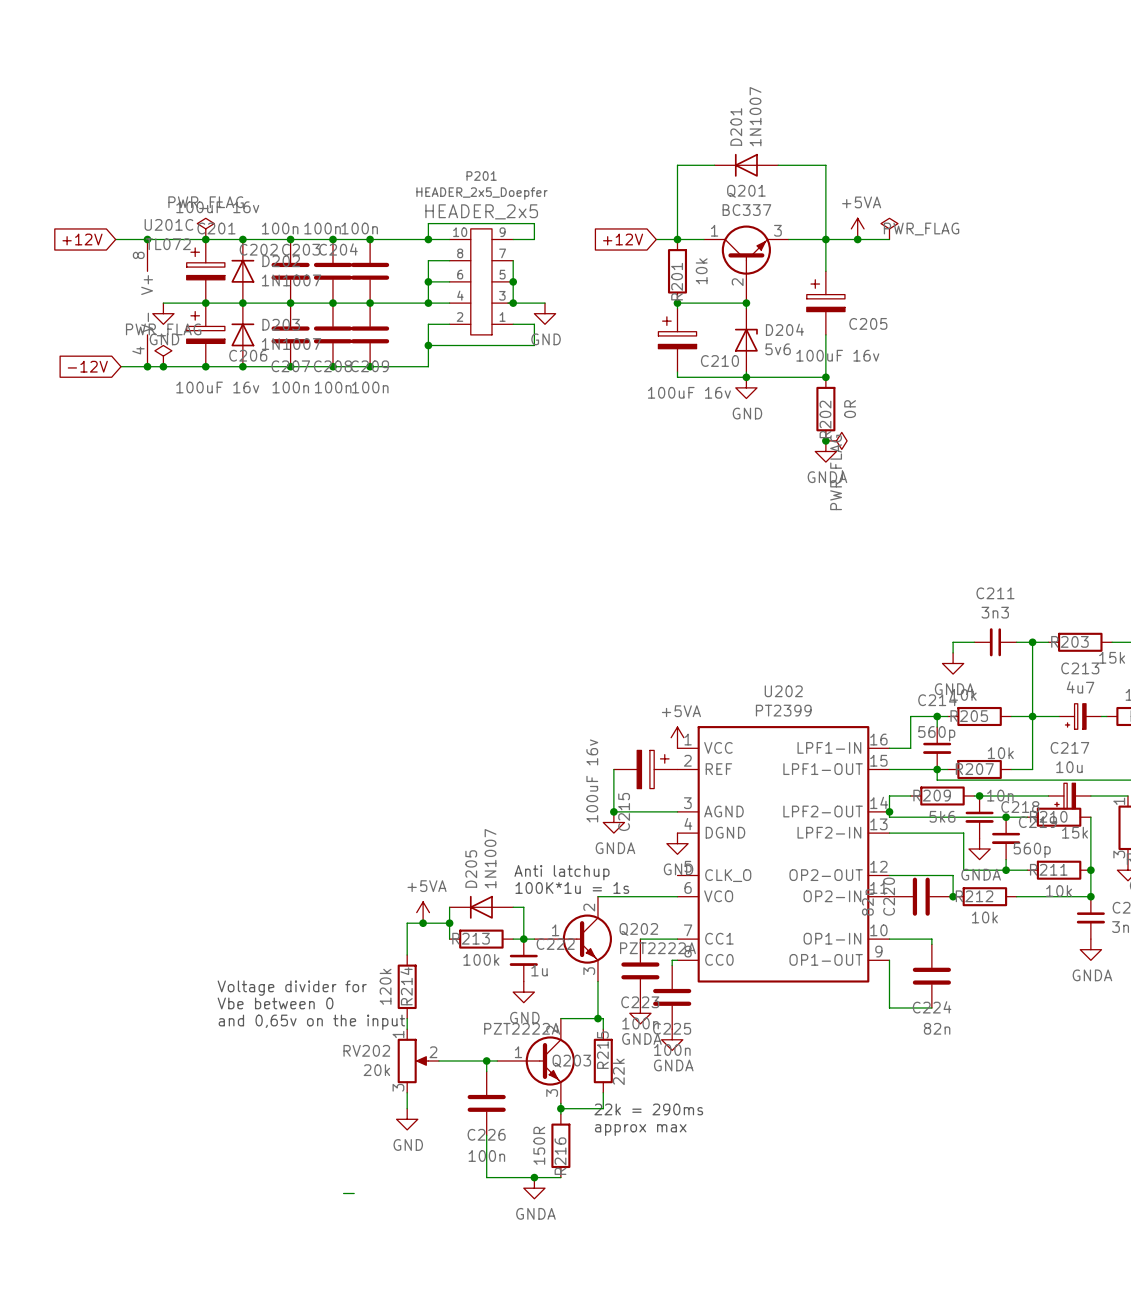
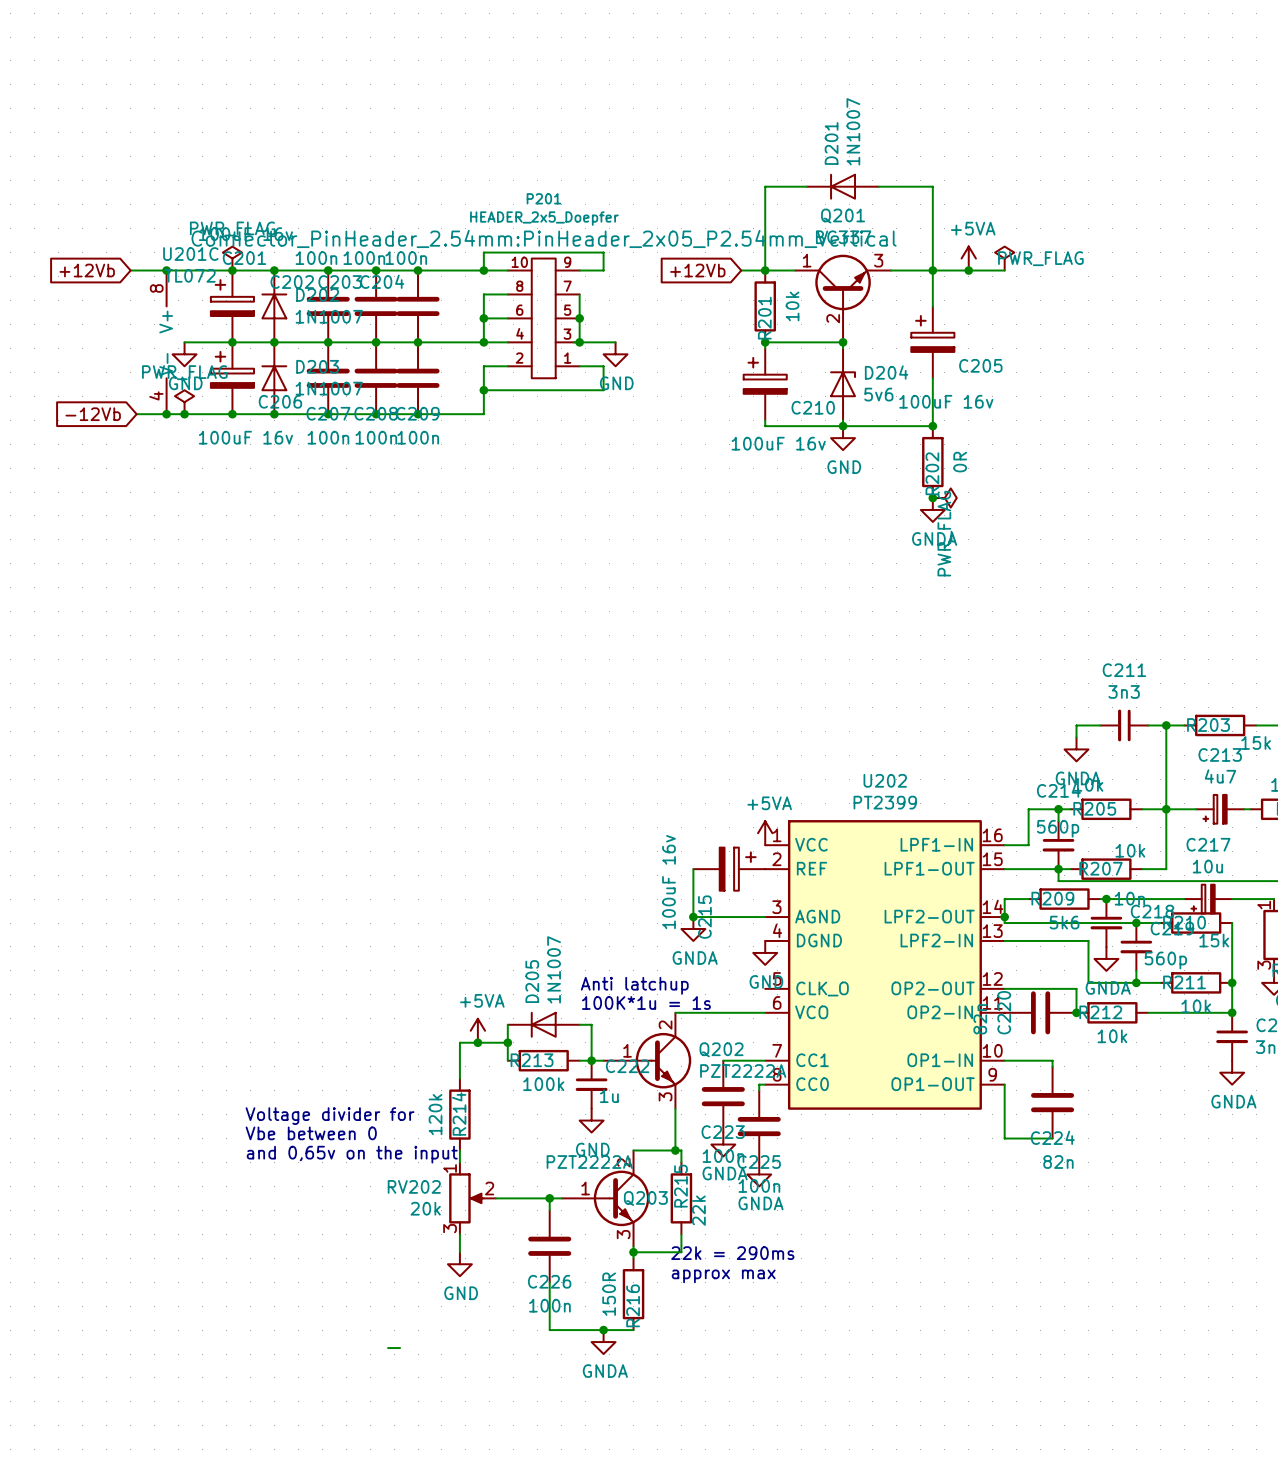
P201 text: HEADER_2x5 (481, 211) -> Connector_PinHeader_2.54mm:PinHeader_2x05_P2.54mm_Vertical (544, 238)
global label: +12V (82, 239) -> +12Vb (87, 270)
global label: +12V (623, 239) -> +12Vb (697, 270)
global label: -12V (87, 366) -> -12Vb (93, 414)

